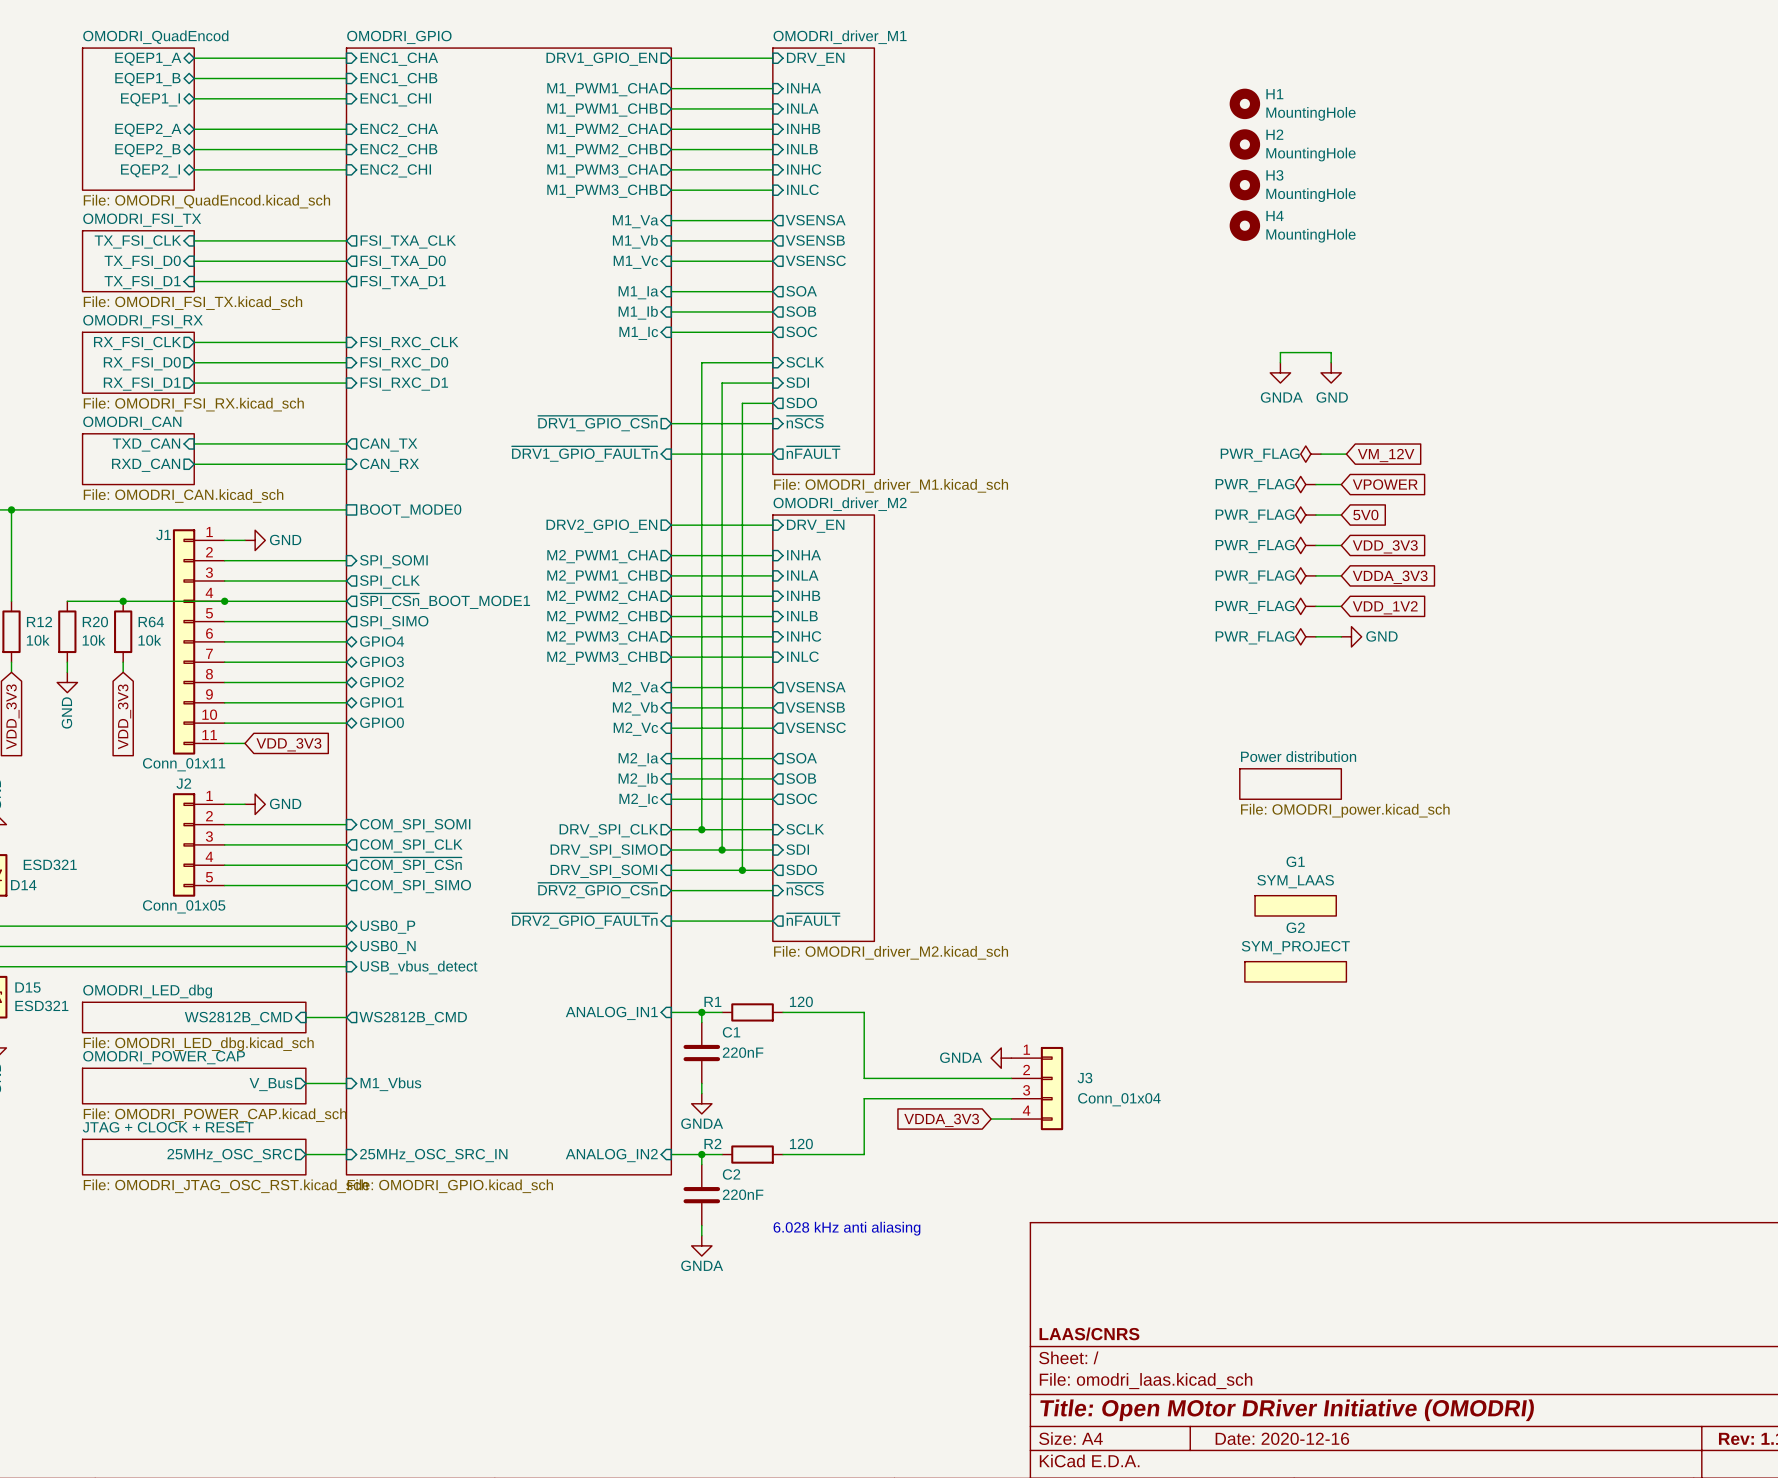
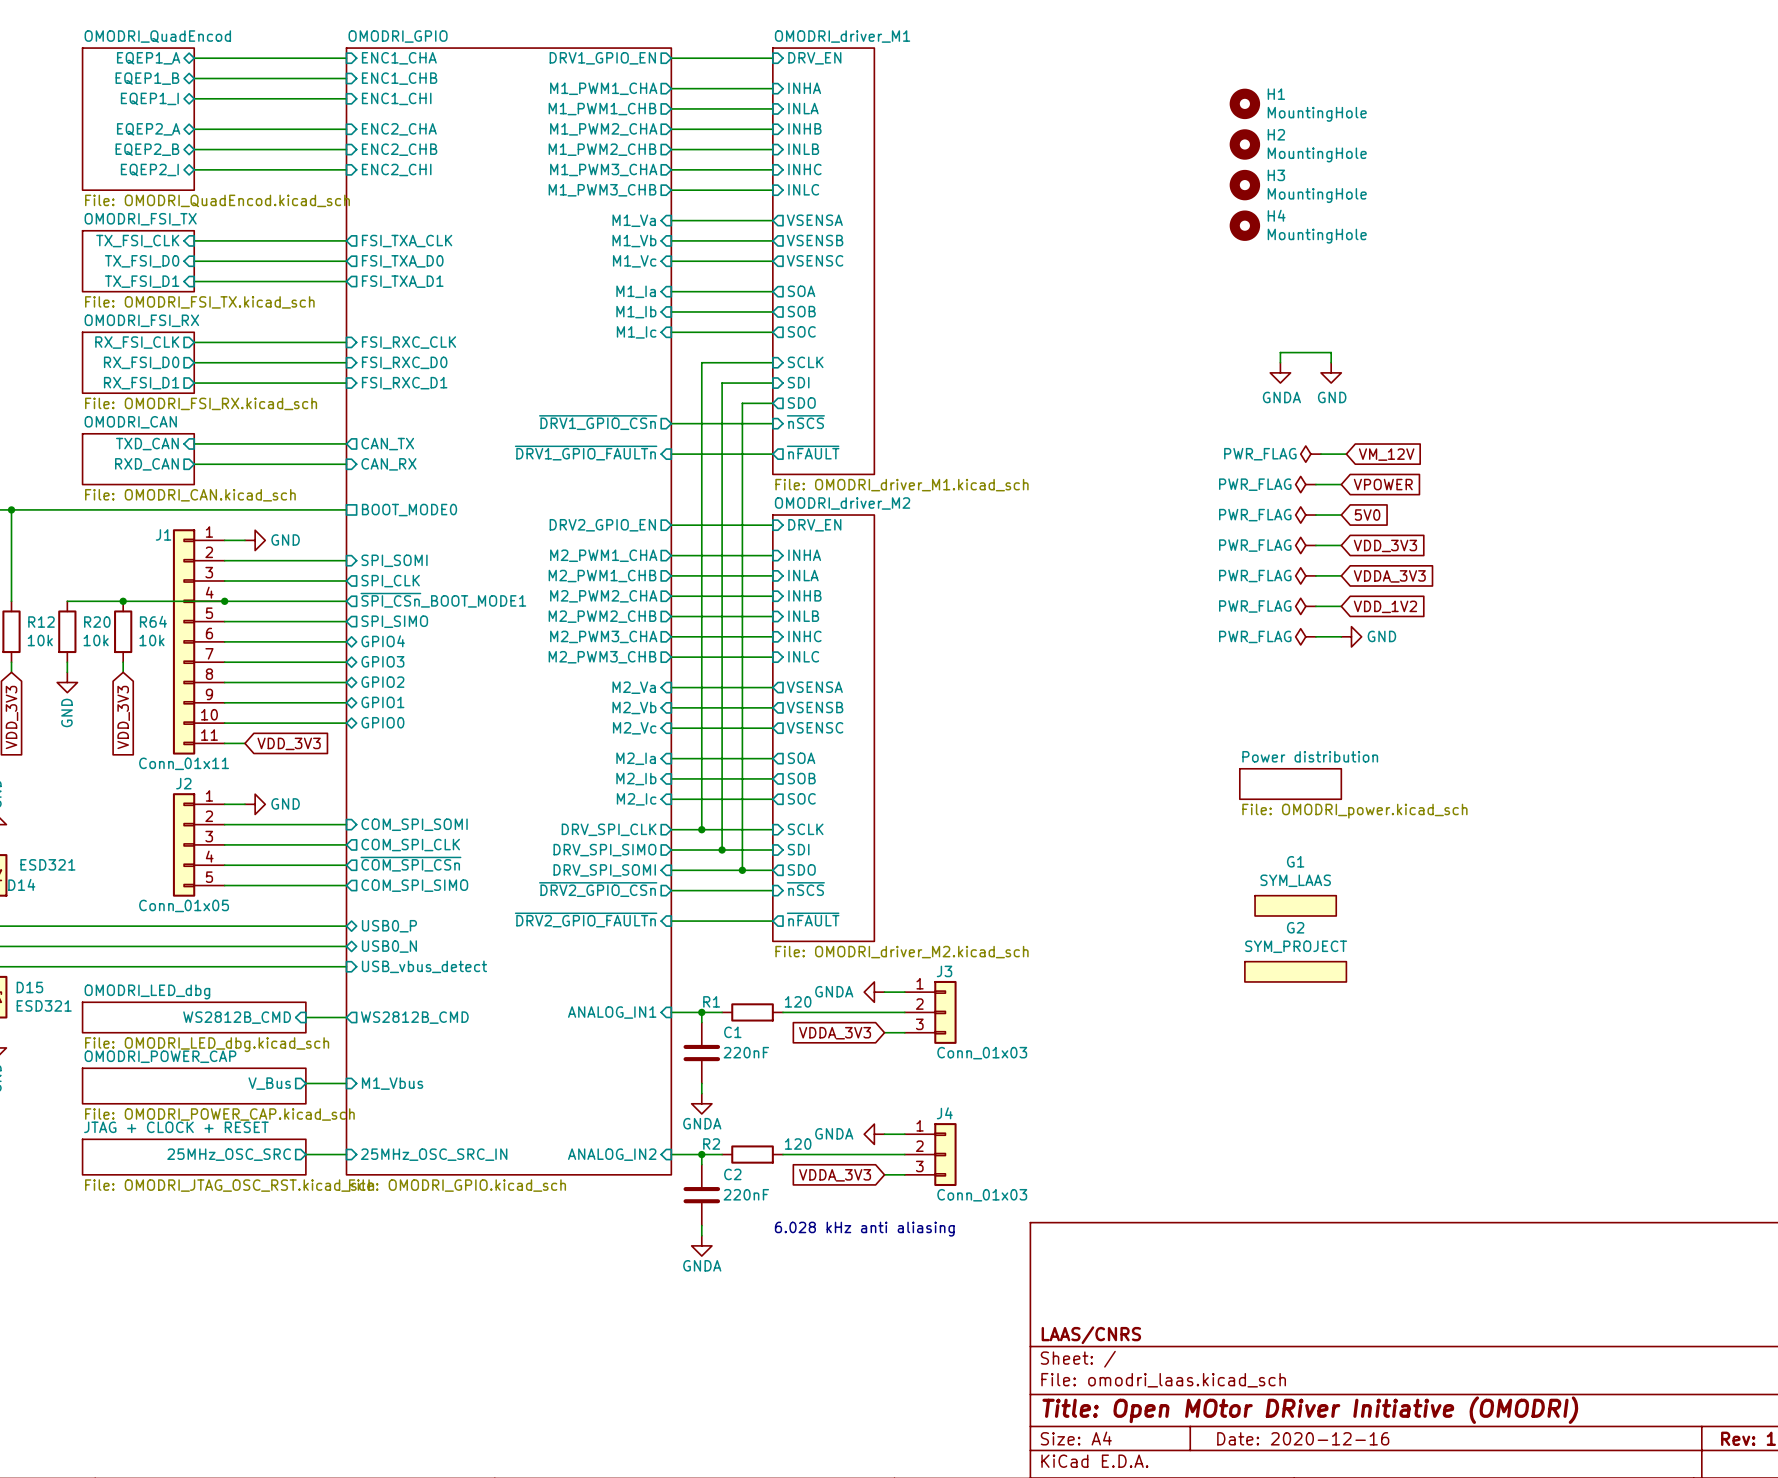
power symbol: none -> GNDA (874, 992)
wire: none -> (884, 992) (904, 992)
wire: (864, 1012) (864, 1078) (1011, 1078) -> (864, 1012) (904, 1012)
wire: none -> (884, 1032) (904, 1032)
global label: none -> VDDA_3V3 (835, 1033)
J3 symbol: [1011, 1046, 1064, 1131] -> [904, 980, 957, 1044]
power symbol: GNDA (1001, 1058) -> none
J3 name position: J3 (1084, 1078) -> J3 (944, 971)
wire: (1011, 1098) (864, 1098) (864, 1154) -> (904, 1154) (864, 1154)
J3 value: Conn_01x04 (1119, 1099) -> Conn_01x03 (982, 1053)
wire: (991, 1119) (1011, 1119) -> (884, 1134) (904, 1134)
global label: VDDA_3V3 (941, 1120) -> none
power symbol: none -> GNDA (874, 1134)
J4: none -> Conn_01x03 (930, 1154)
wire: none -> (884, 1174) (904, 1174)
global label: none -> VDDA_3V3 (835, 1175)

